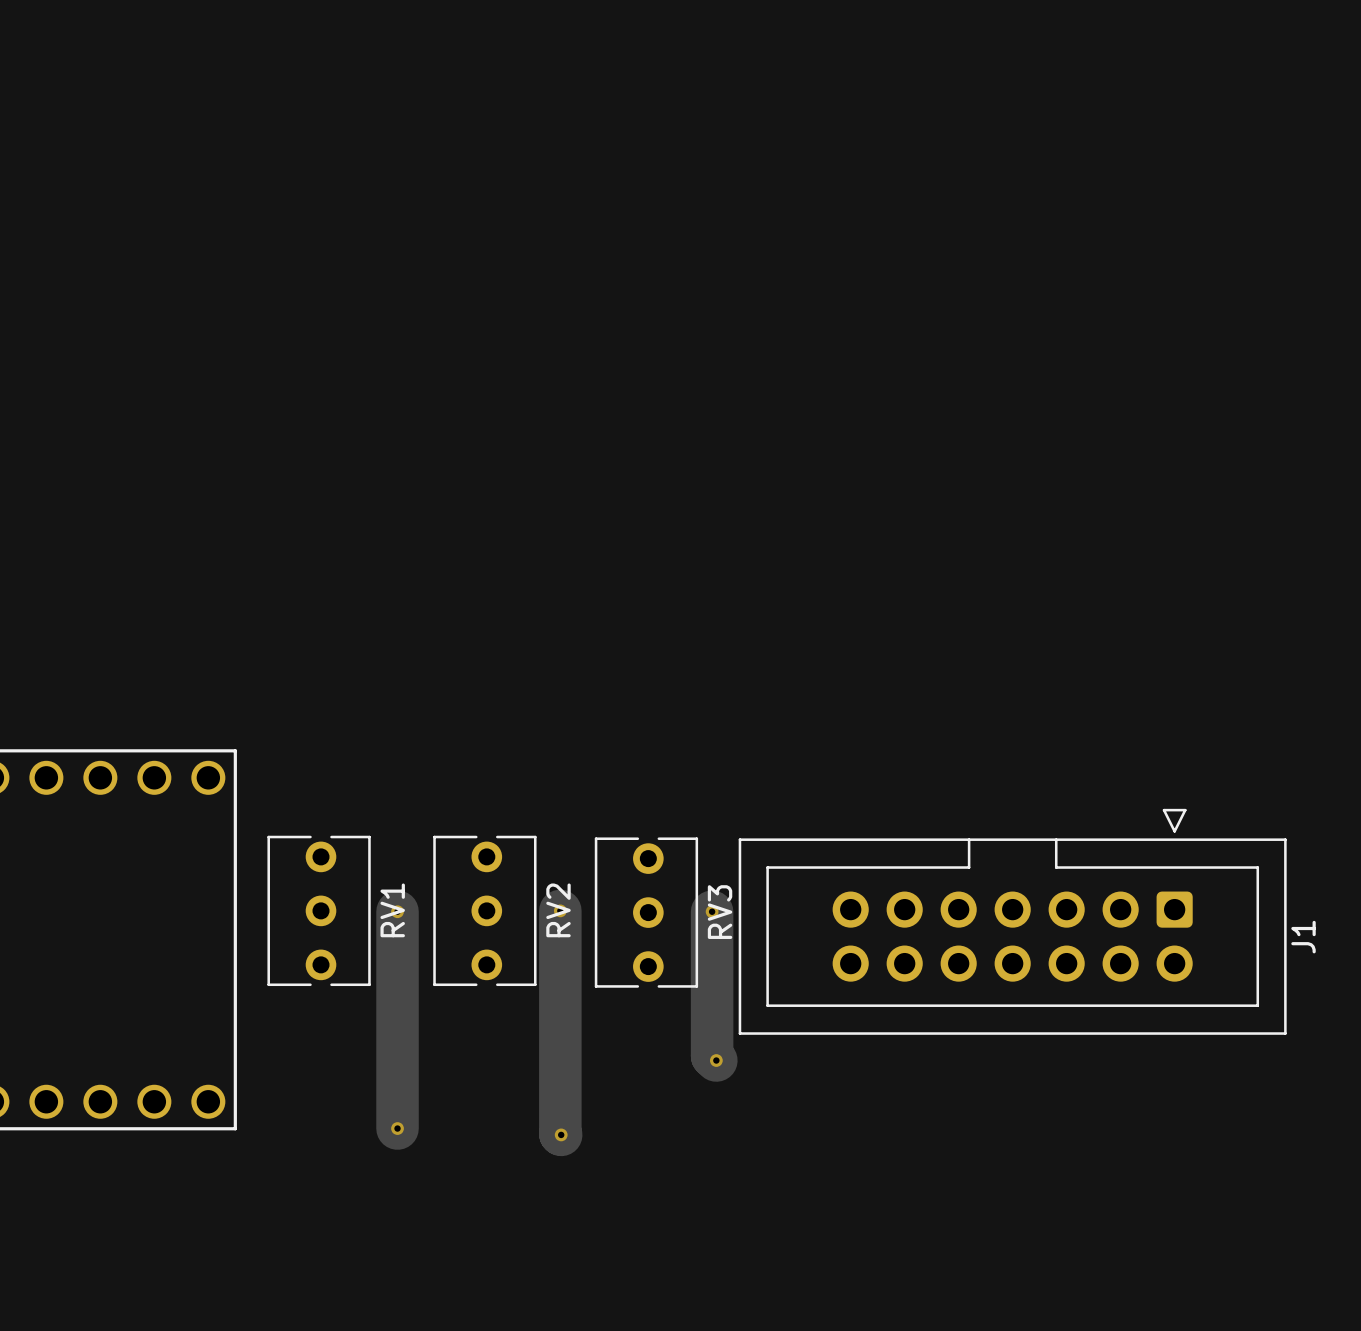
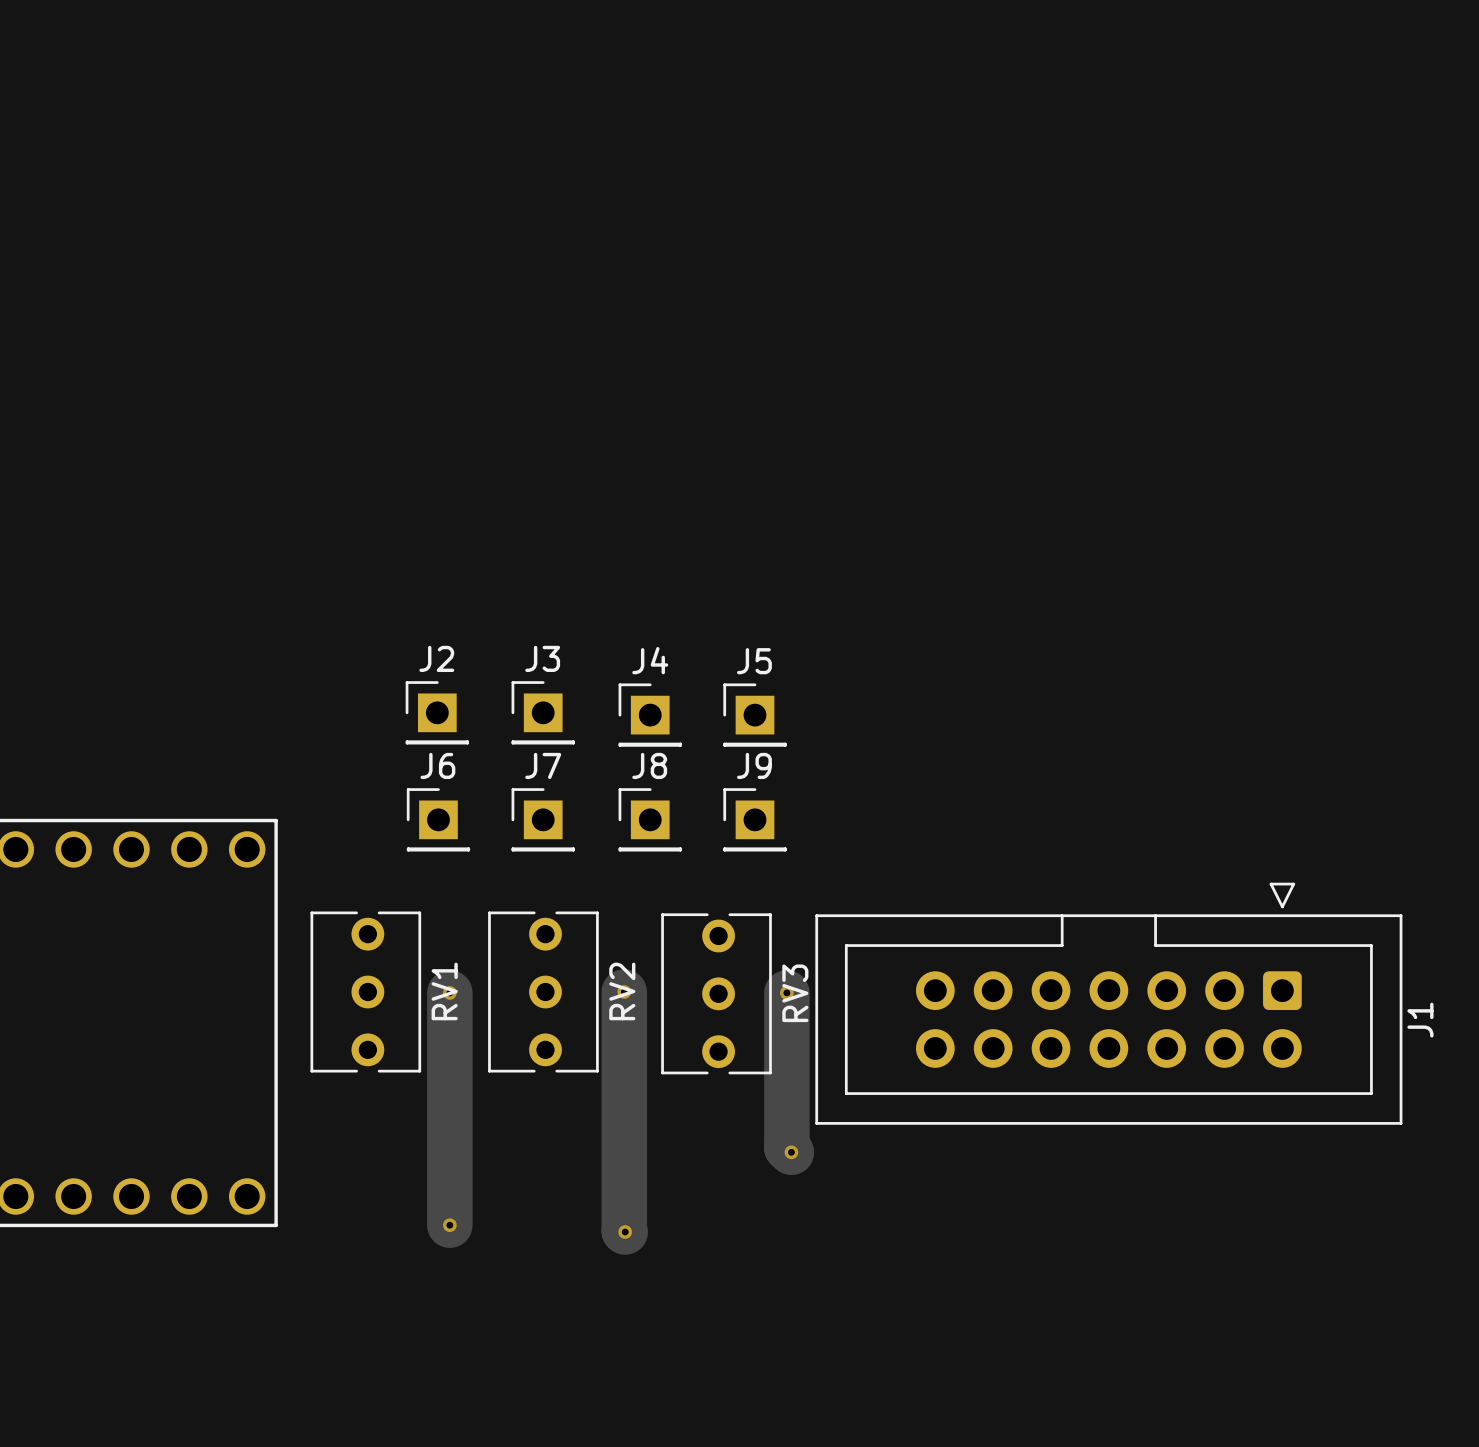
J2: none -> (437, 712)
J3: none -> (543, 712)
J4: none -> (650, 715)
J5: none -> (754, 715)
J6: none -> (438, 819)
J7: none -> (543, 819)
J8: none -> (650, 819)
J9: none -> (754, 819)

